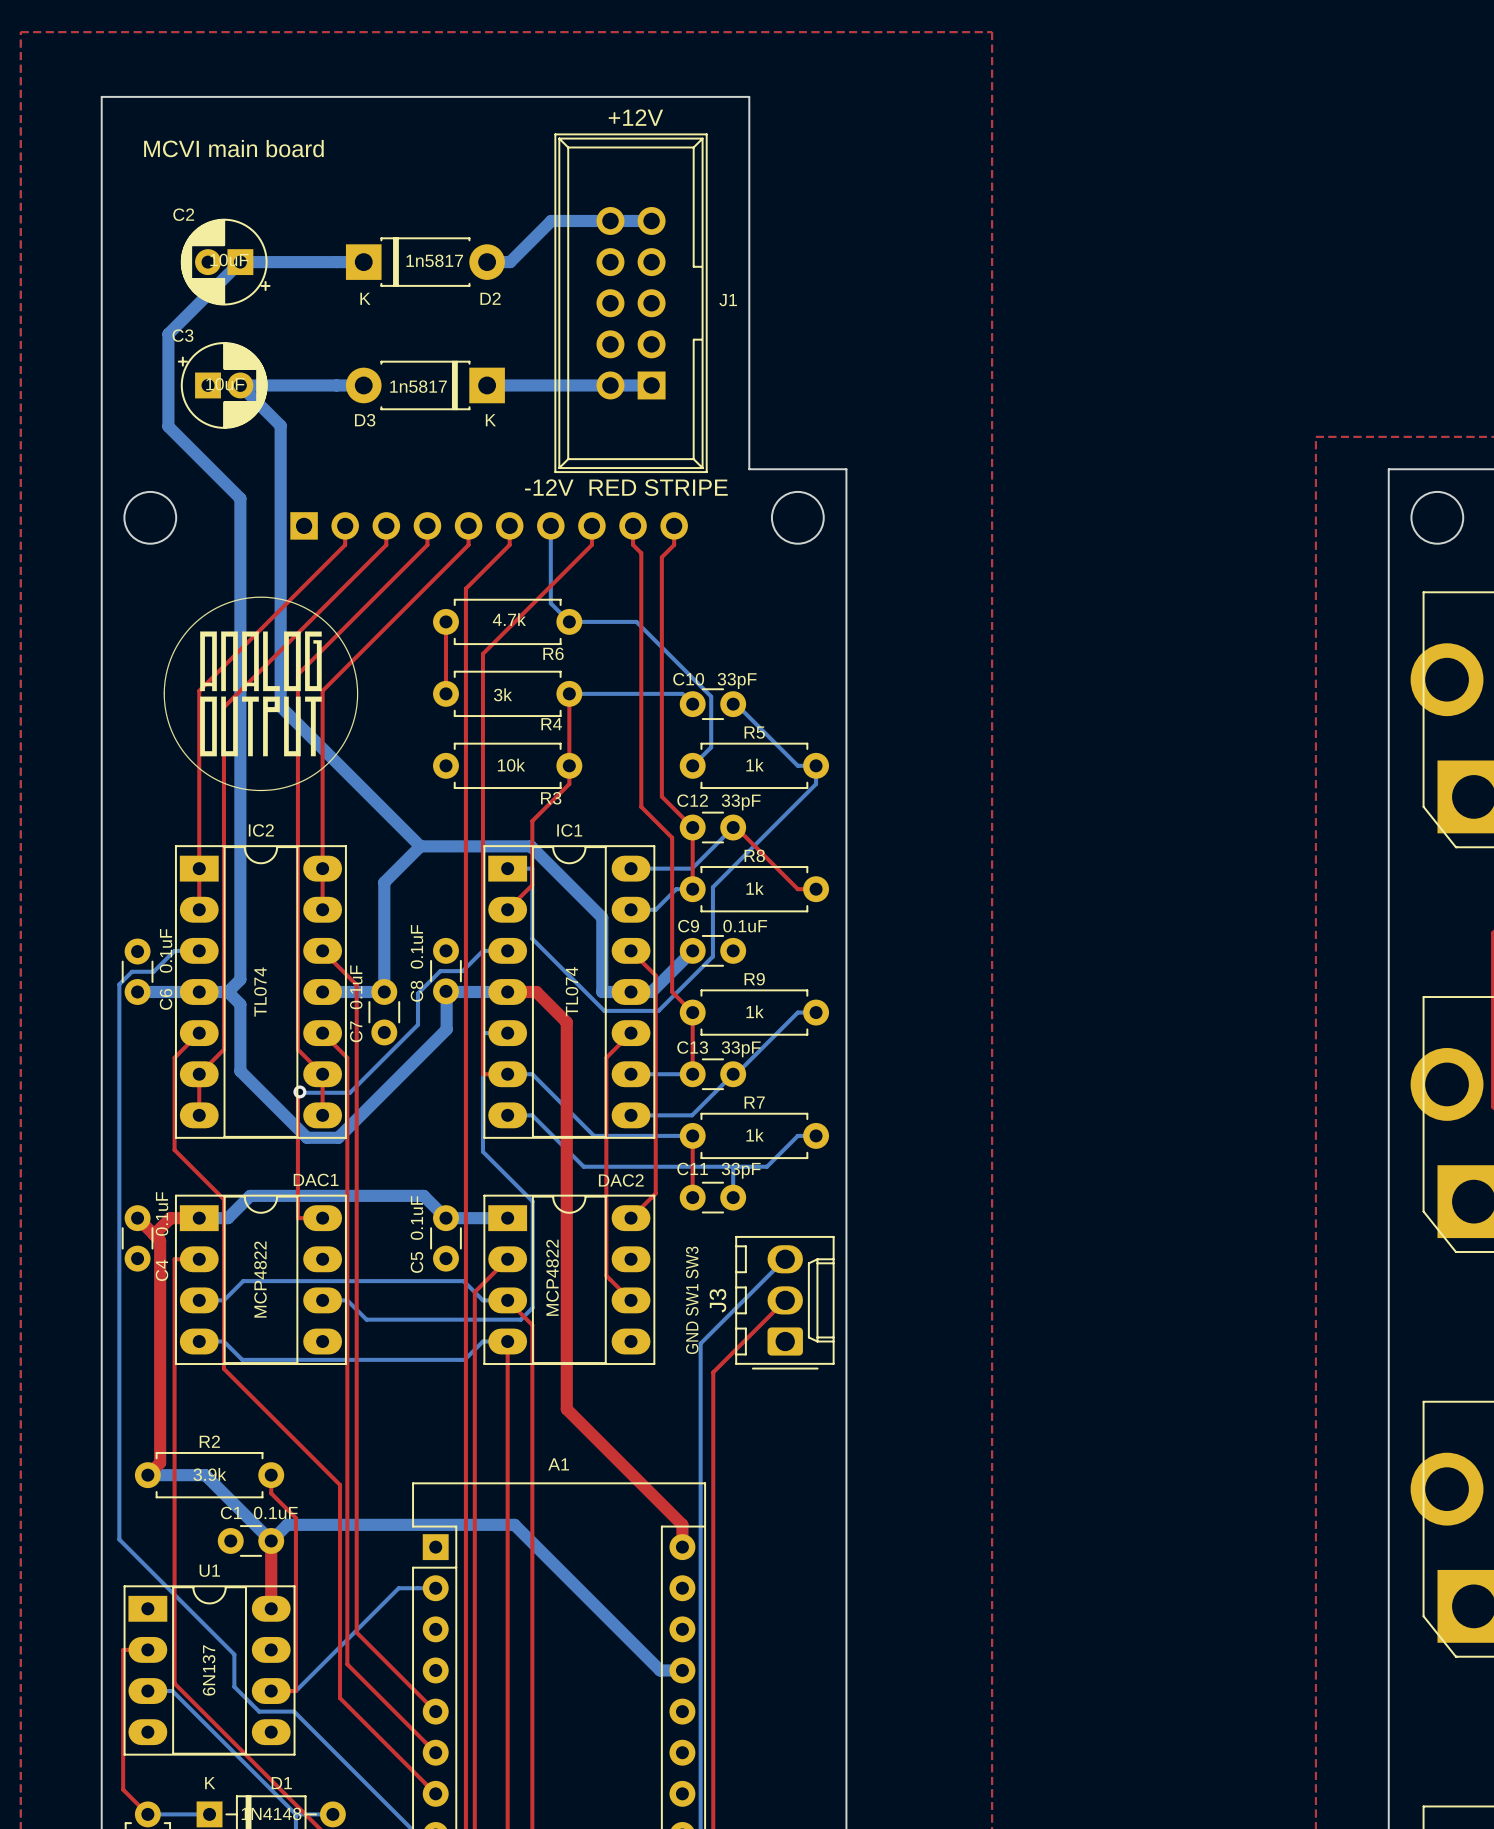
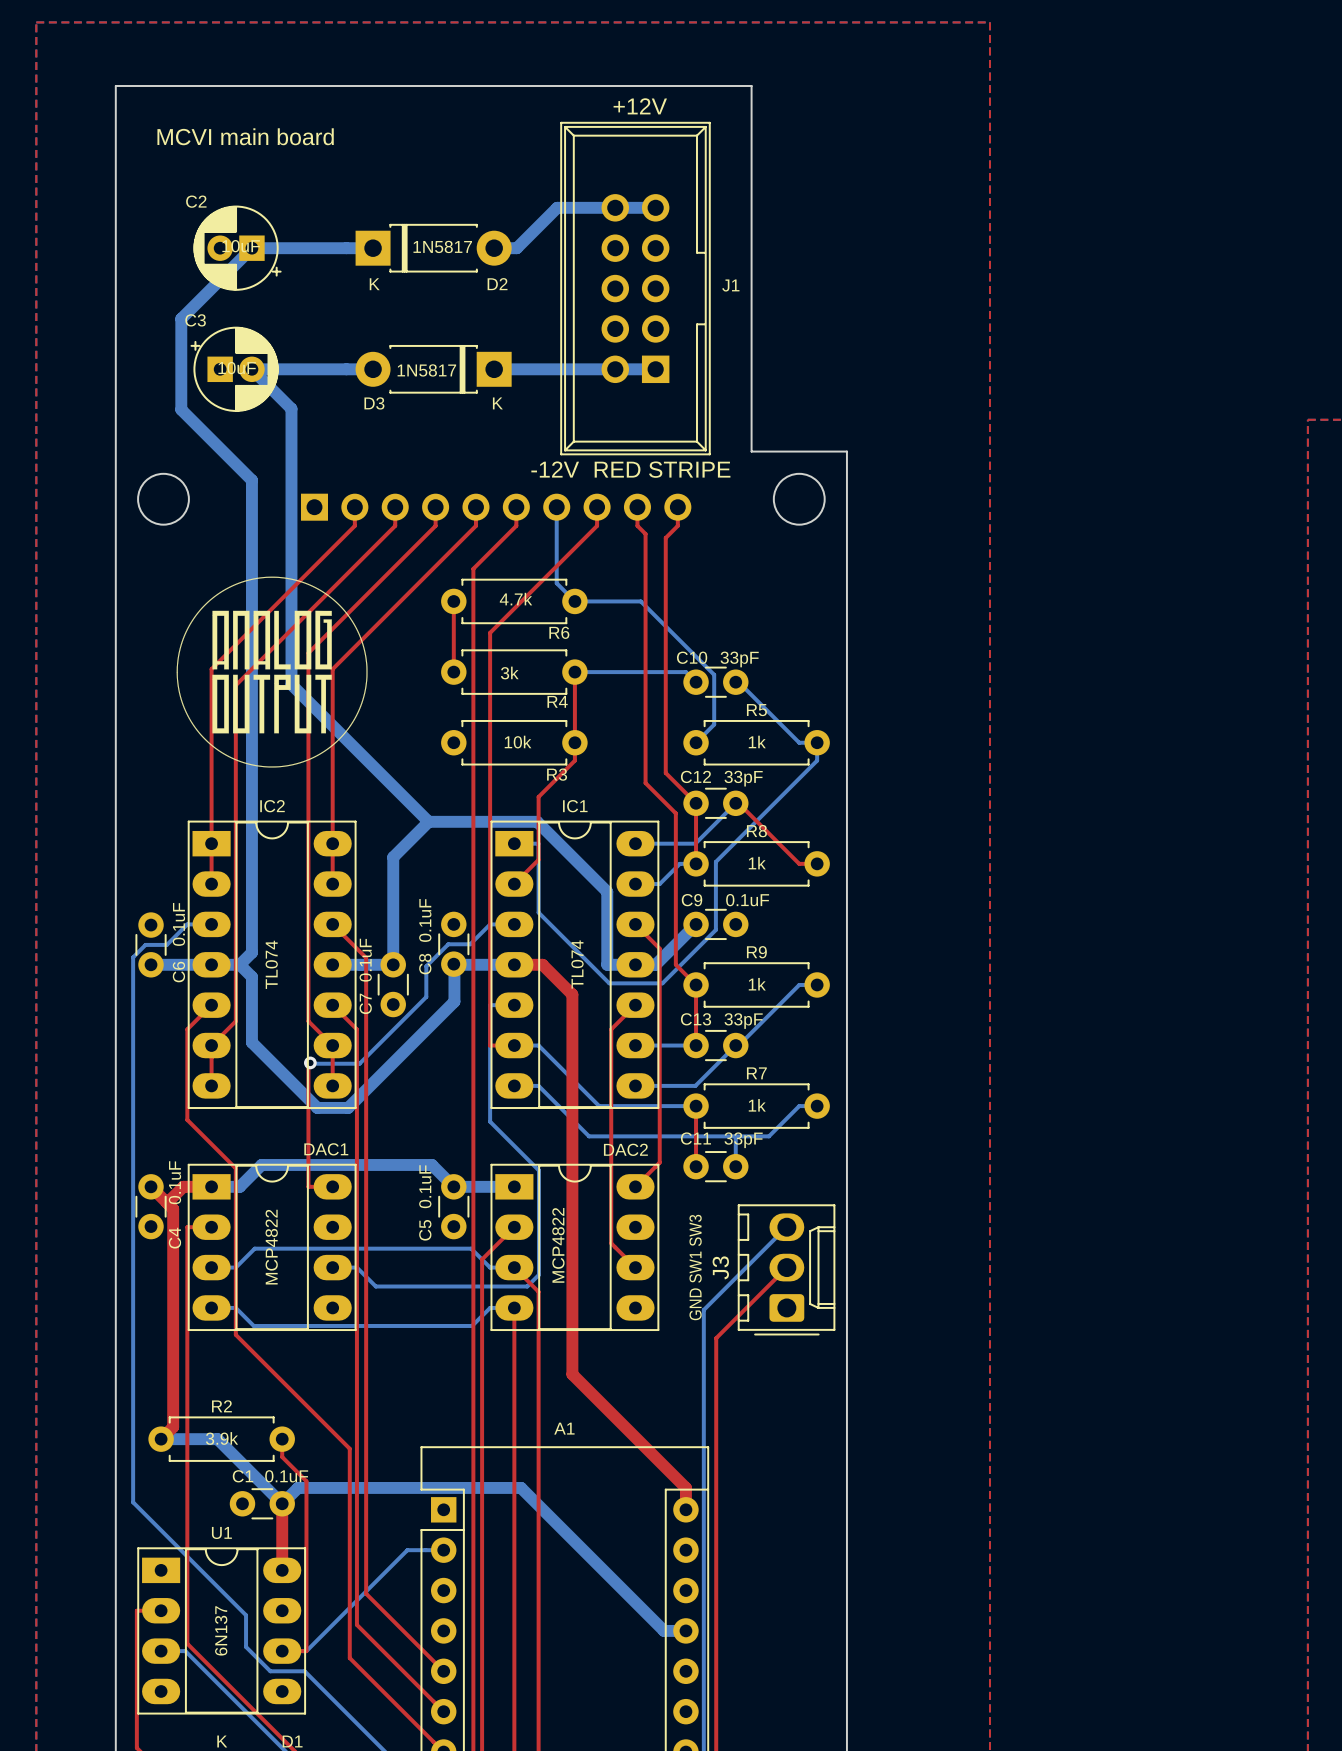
D2 value: 1n5817 (434, 260) -> 1N5817 (442, 246)
D3 value: 1n5817 (418, 386) -> 1N5817 (426, 370)

